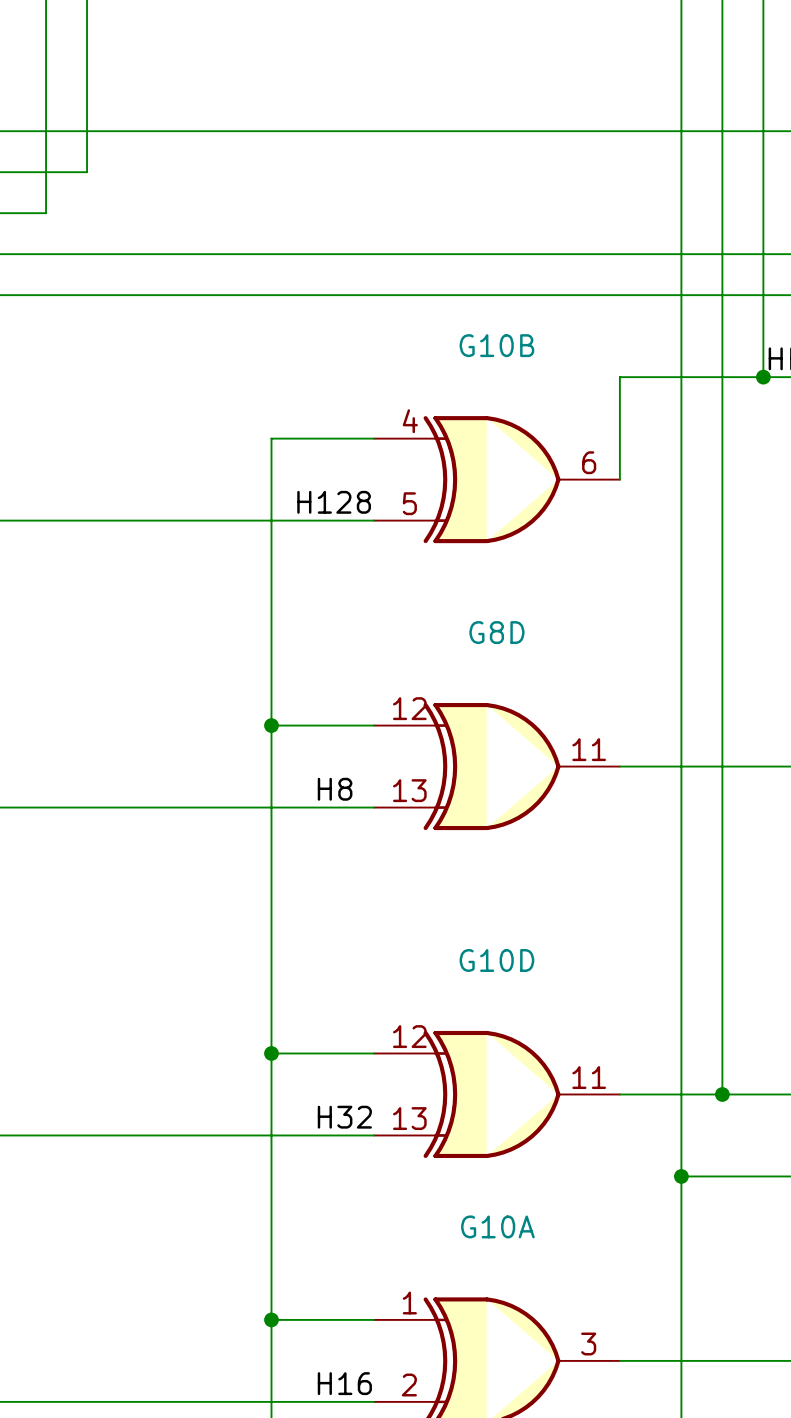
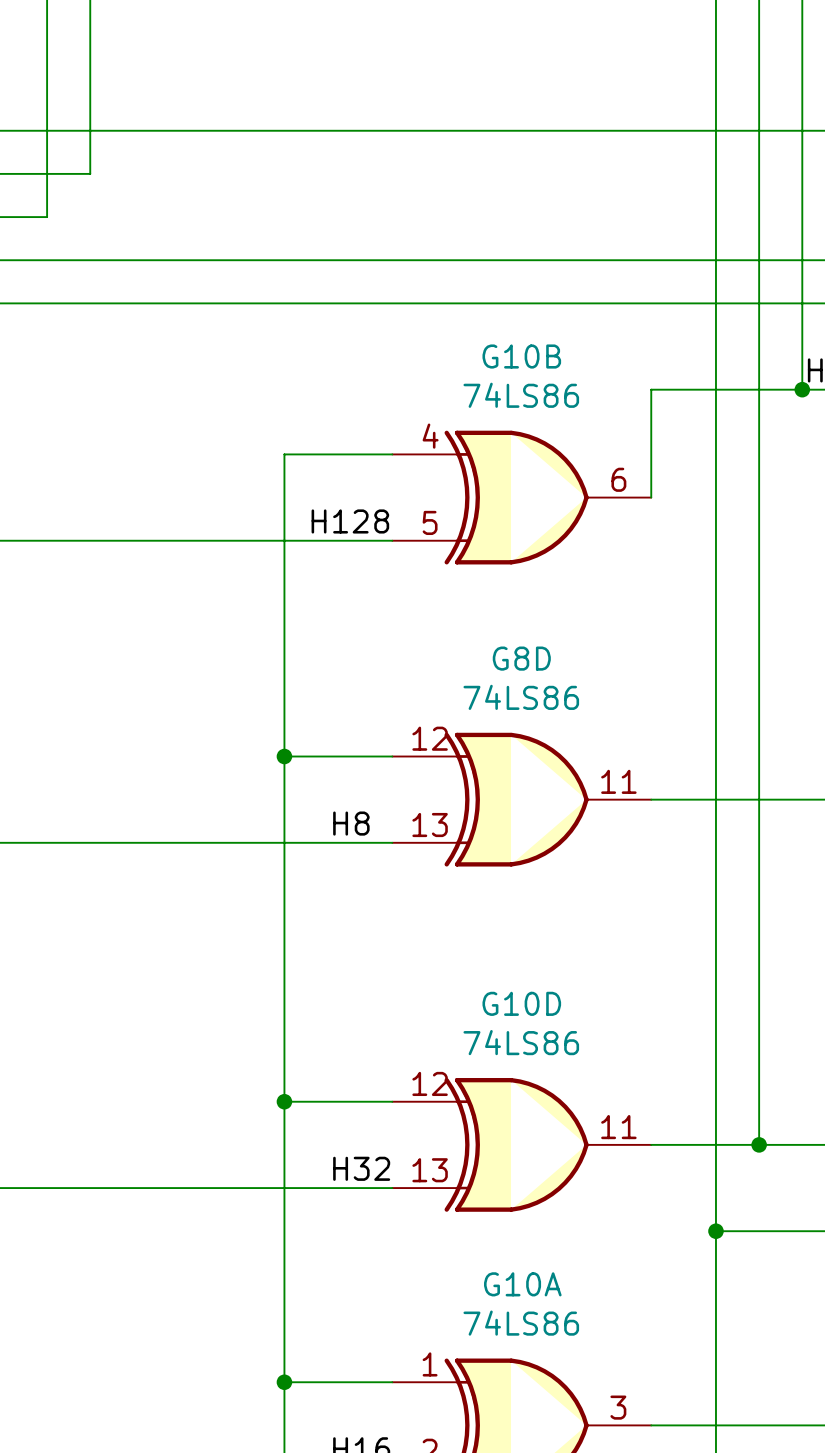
G10B value: none -> 74LS86 (521, 395)
G8D value: none -> 74LS86 (521, 697)
G10D value: none -> 74LS86 (521, 1042)
G10A value: none -> 74LS86 (521, 1323)

